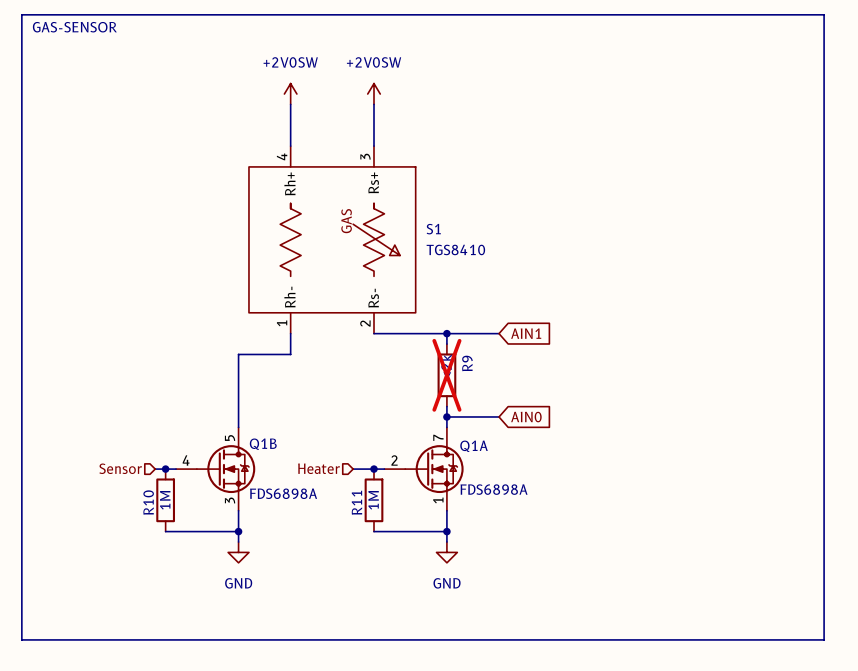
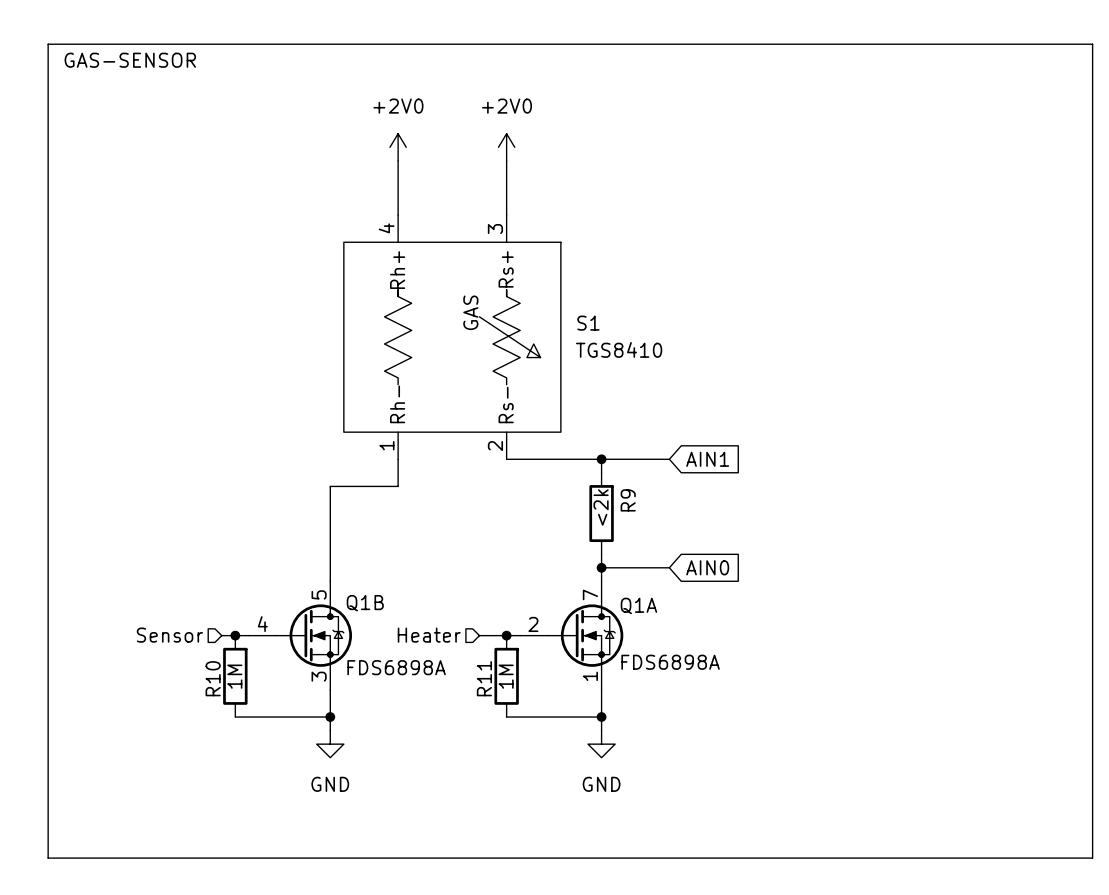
power symbol: +2V0SW (290, 94) -> +2V0 (398, 147)
power symbol: +2V0SW (374, 94) -> +2V0 (506, 147)
R9 do-not-place cross: (446, 375) -> none

